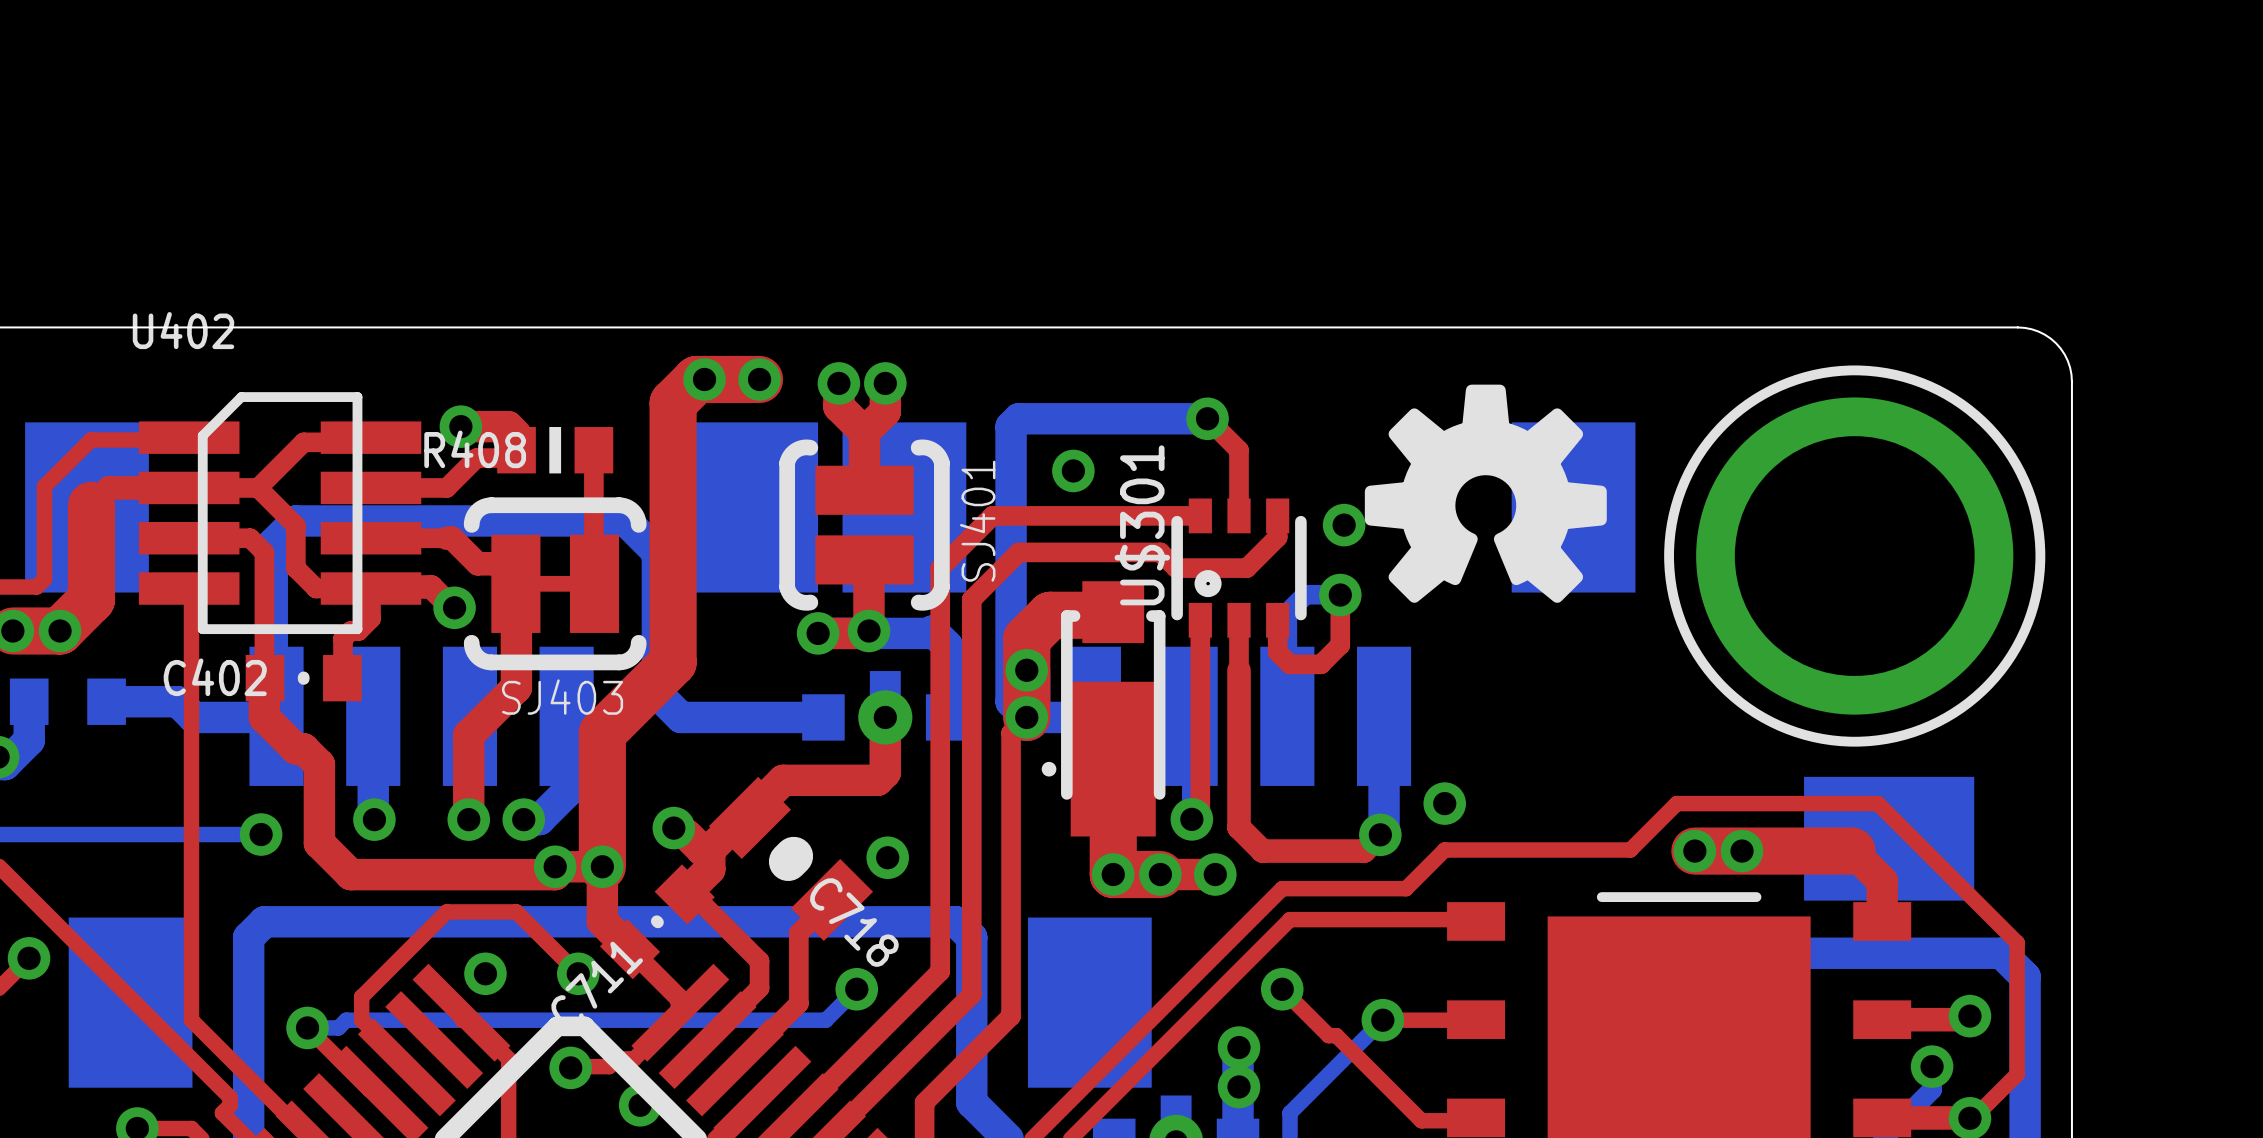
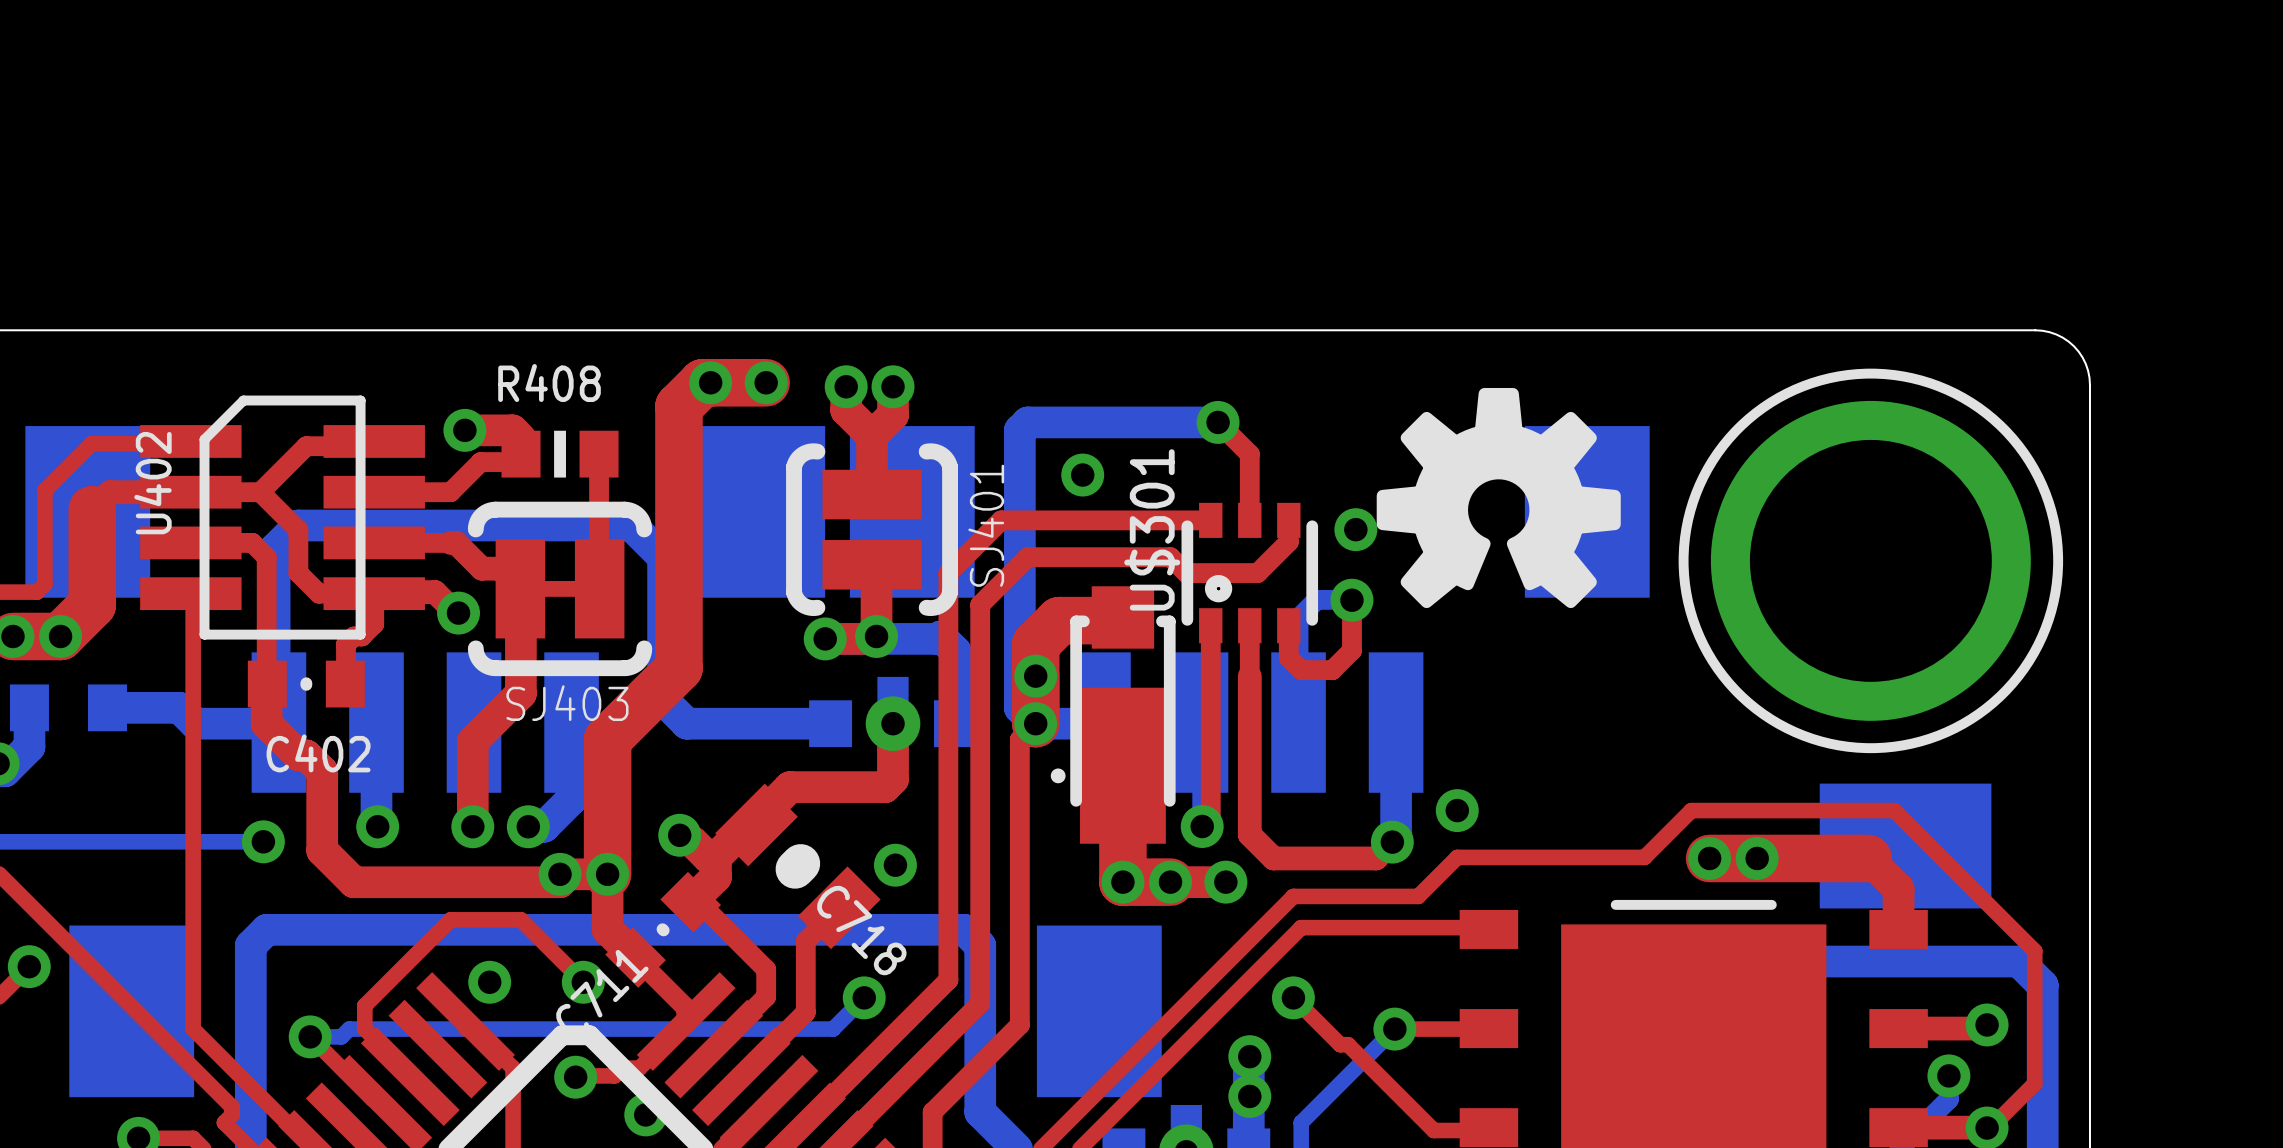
U402 name rotation: 0° (183, 330) -> 90° counterclockwise (152, 483)
U402 name position: U402 (183, 330) -> U402 (152, 483)
R408 name position: R408 (475, 449) -> R408 (549, 383)
C402 name position: C402 (215, 677) -> C402 (318, 753)

